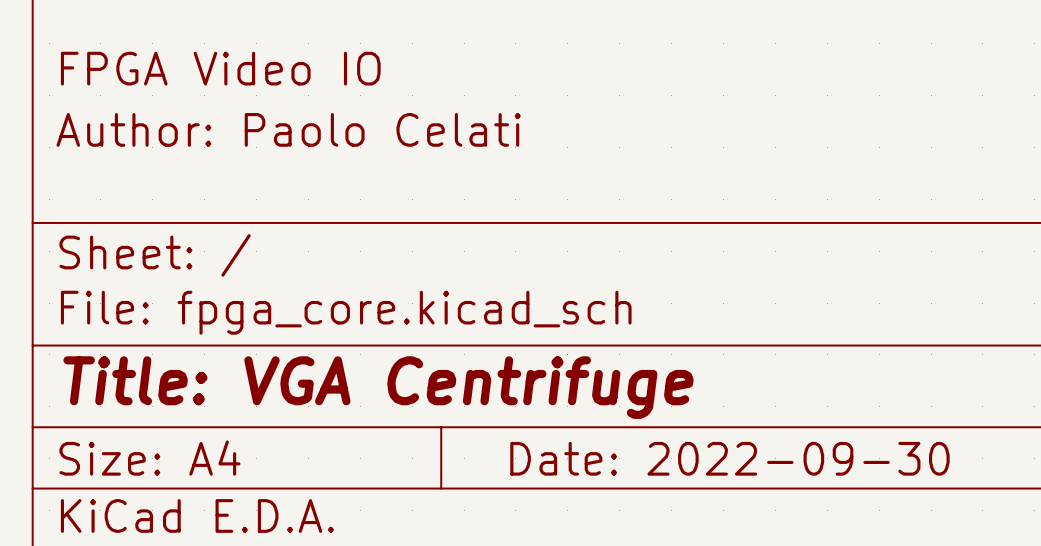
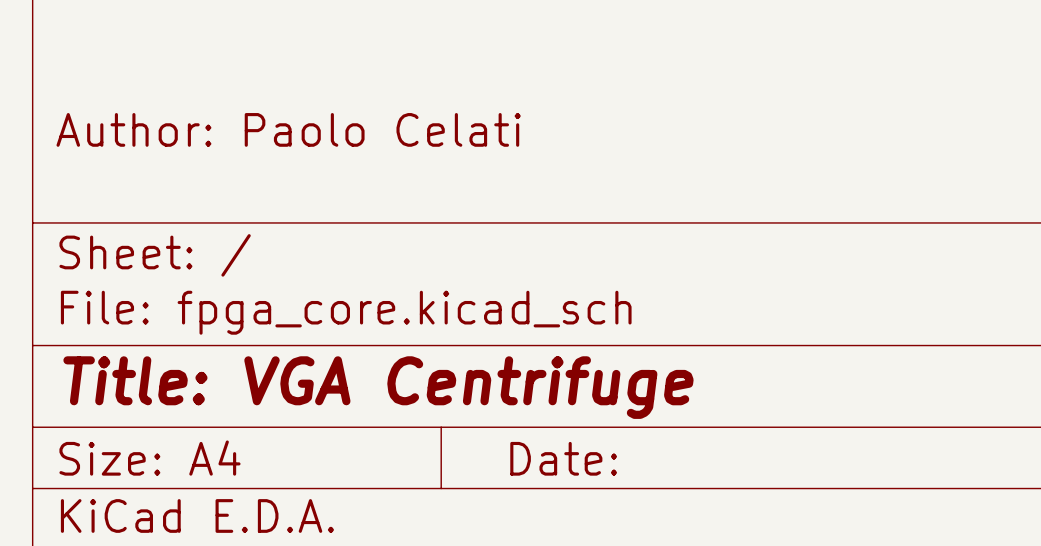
title block: FPGA Video IO (220, 68) -> none
title block: Date: 2022-09-30 (729, 458) -> Date: (563, 458)

